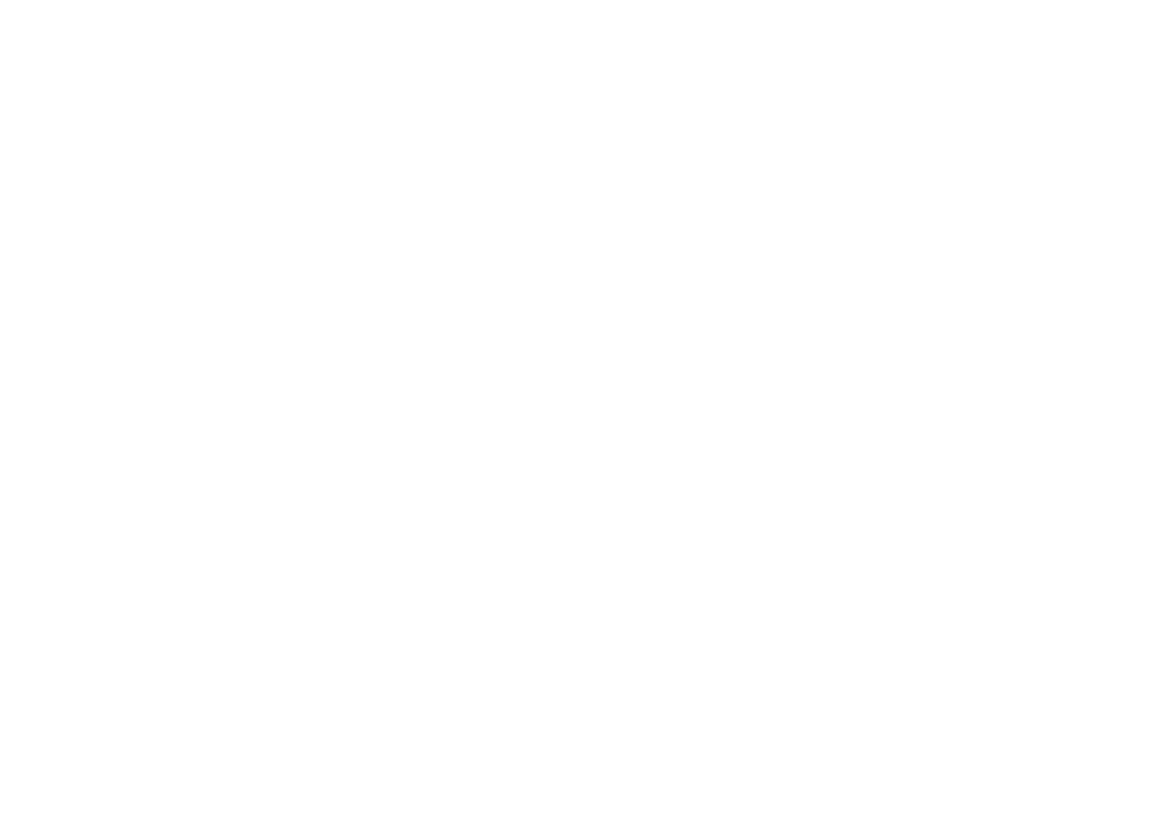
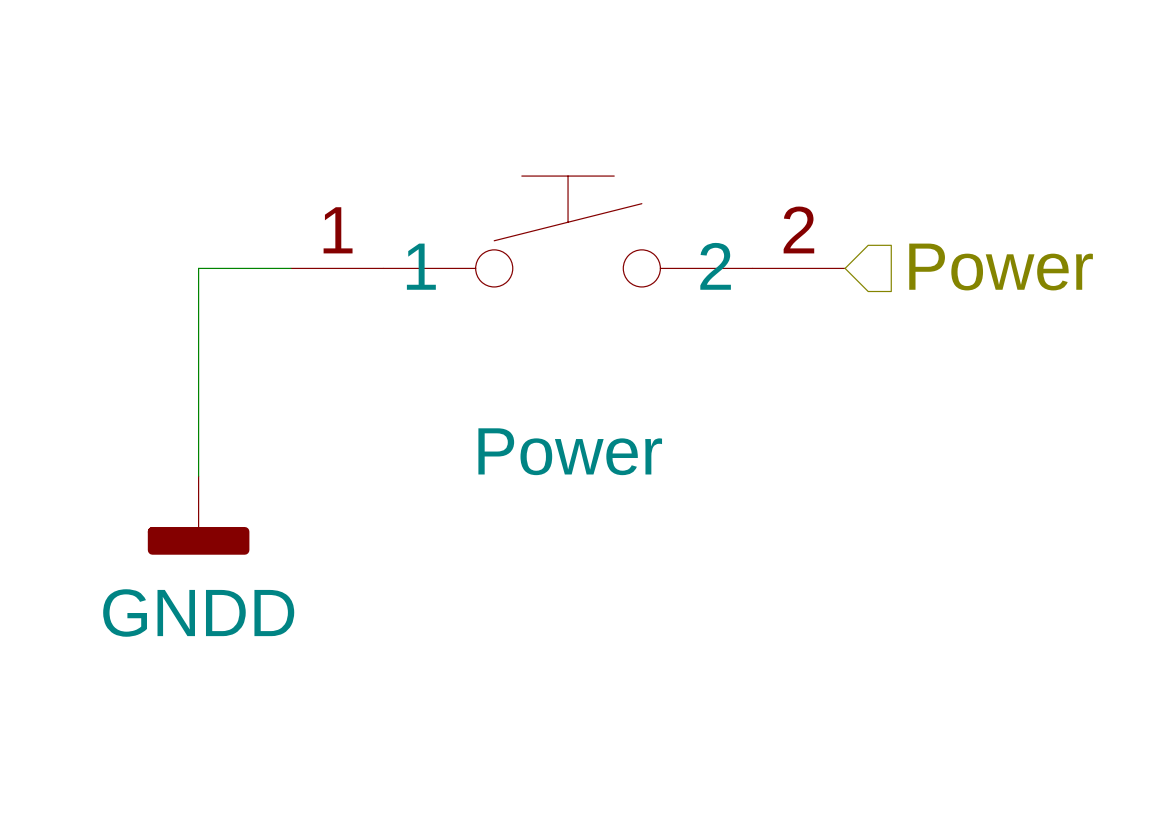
part: none -> Power (568, 231)
hierarchical label: none -> Power (1001, 267)
wire: none -> (290, 268) (198, 268) (198, 476)
power symbol: none -> GNDD (198, 515)

